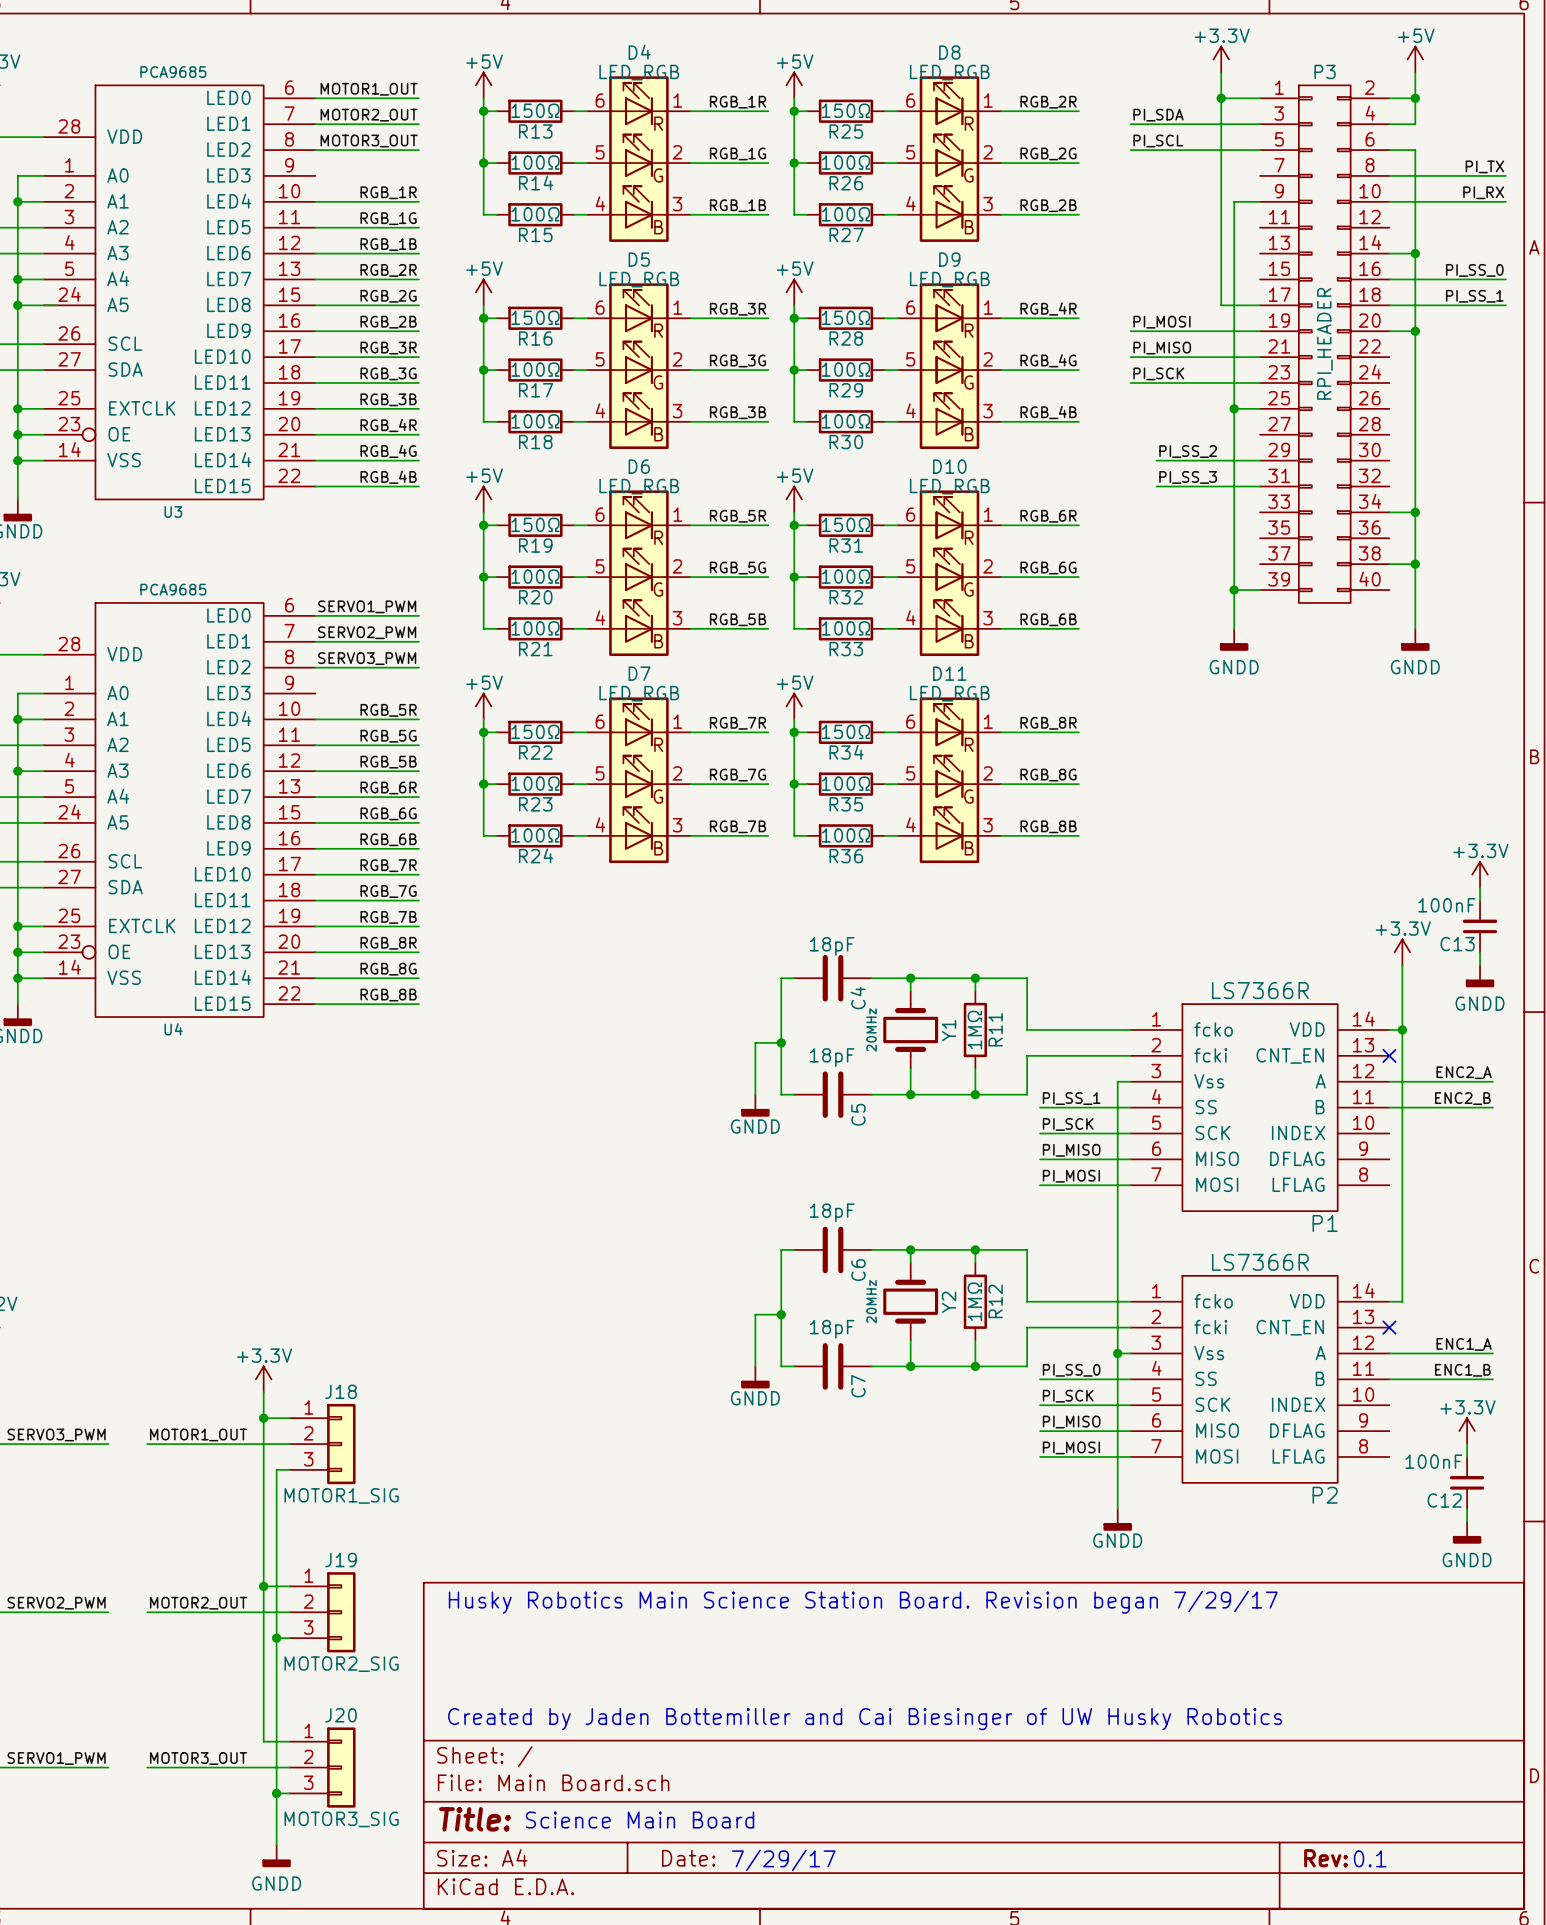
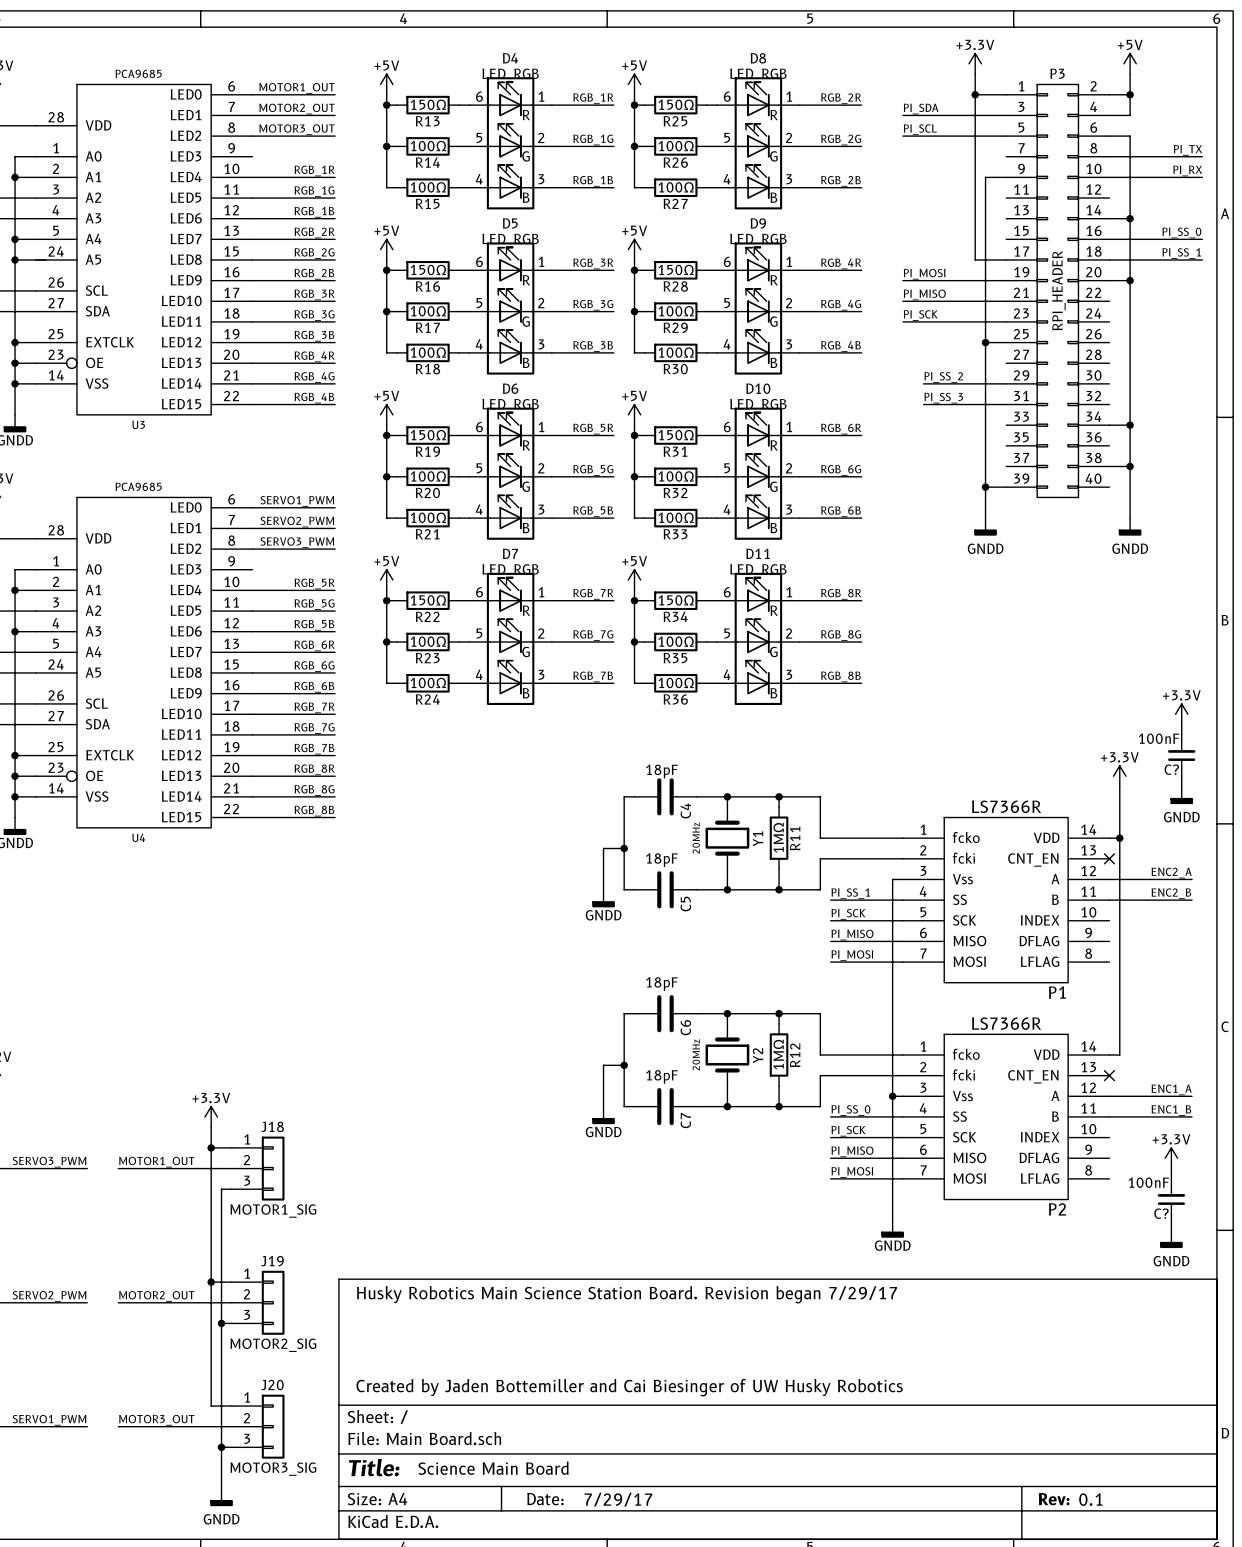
C13 name: C13 (1457, 944) -> C? (1171, 769)
C12 name: C12 (1444, 1500) -> C? (1161, 1213)

